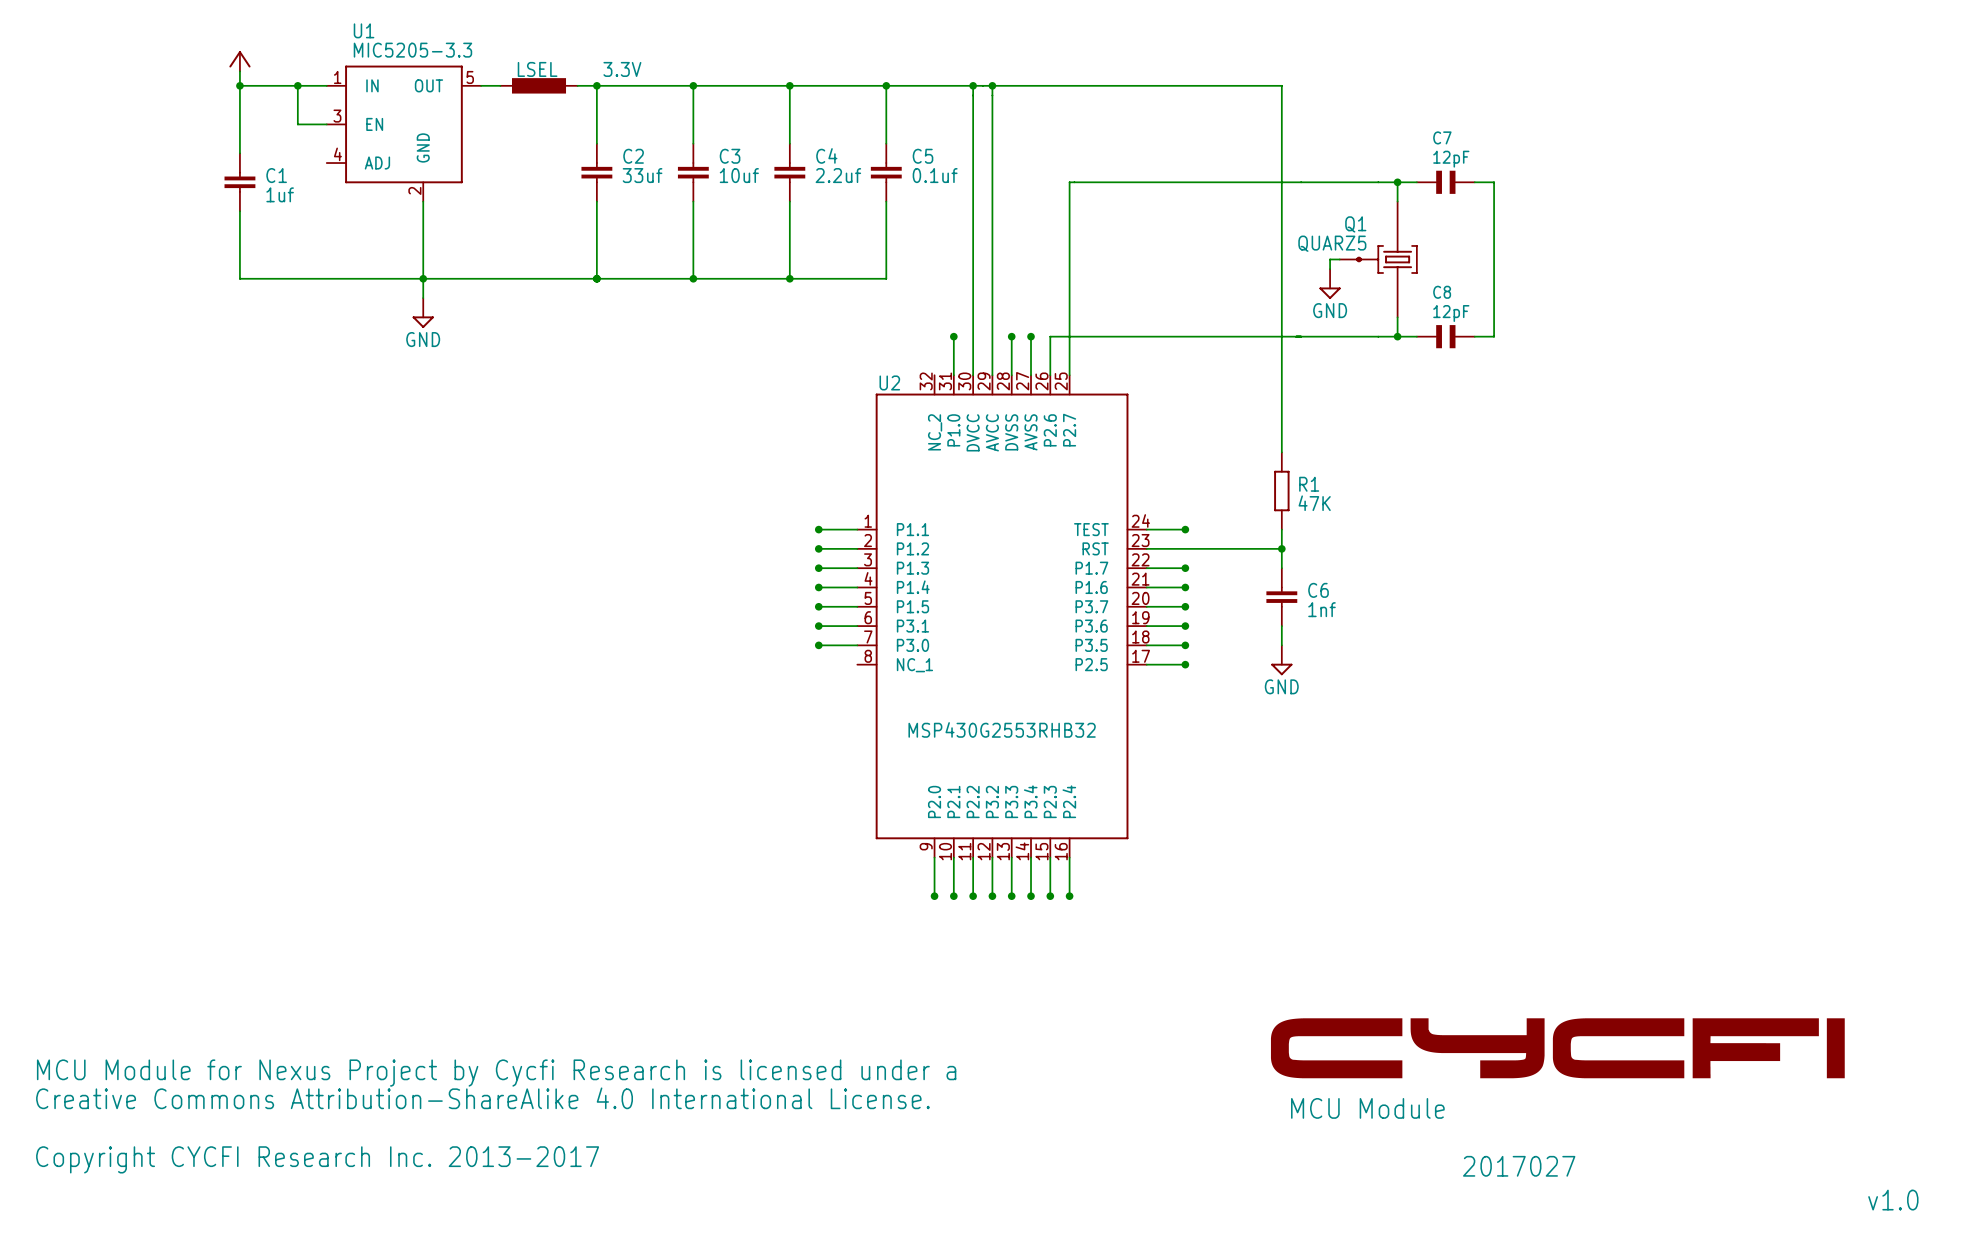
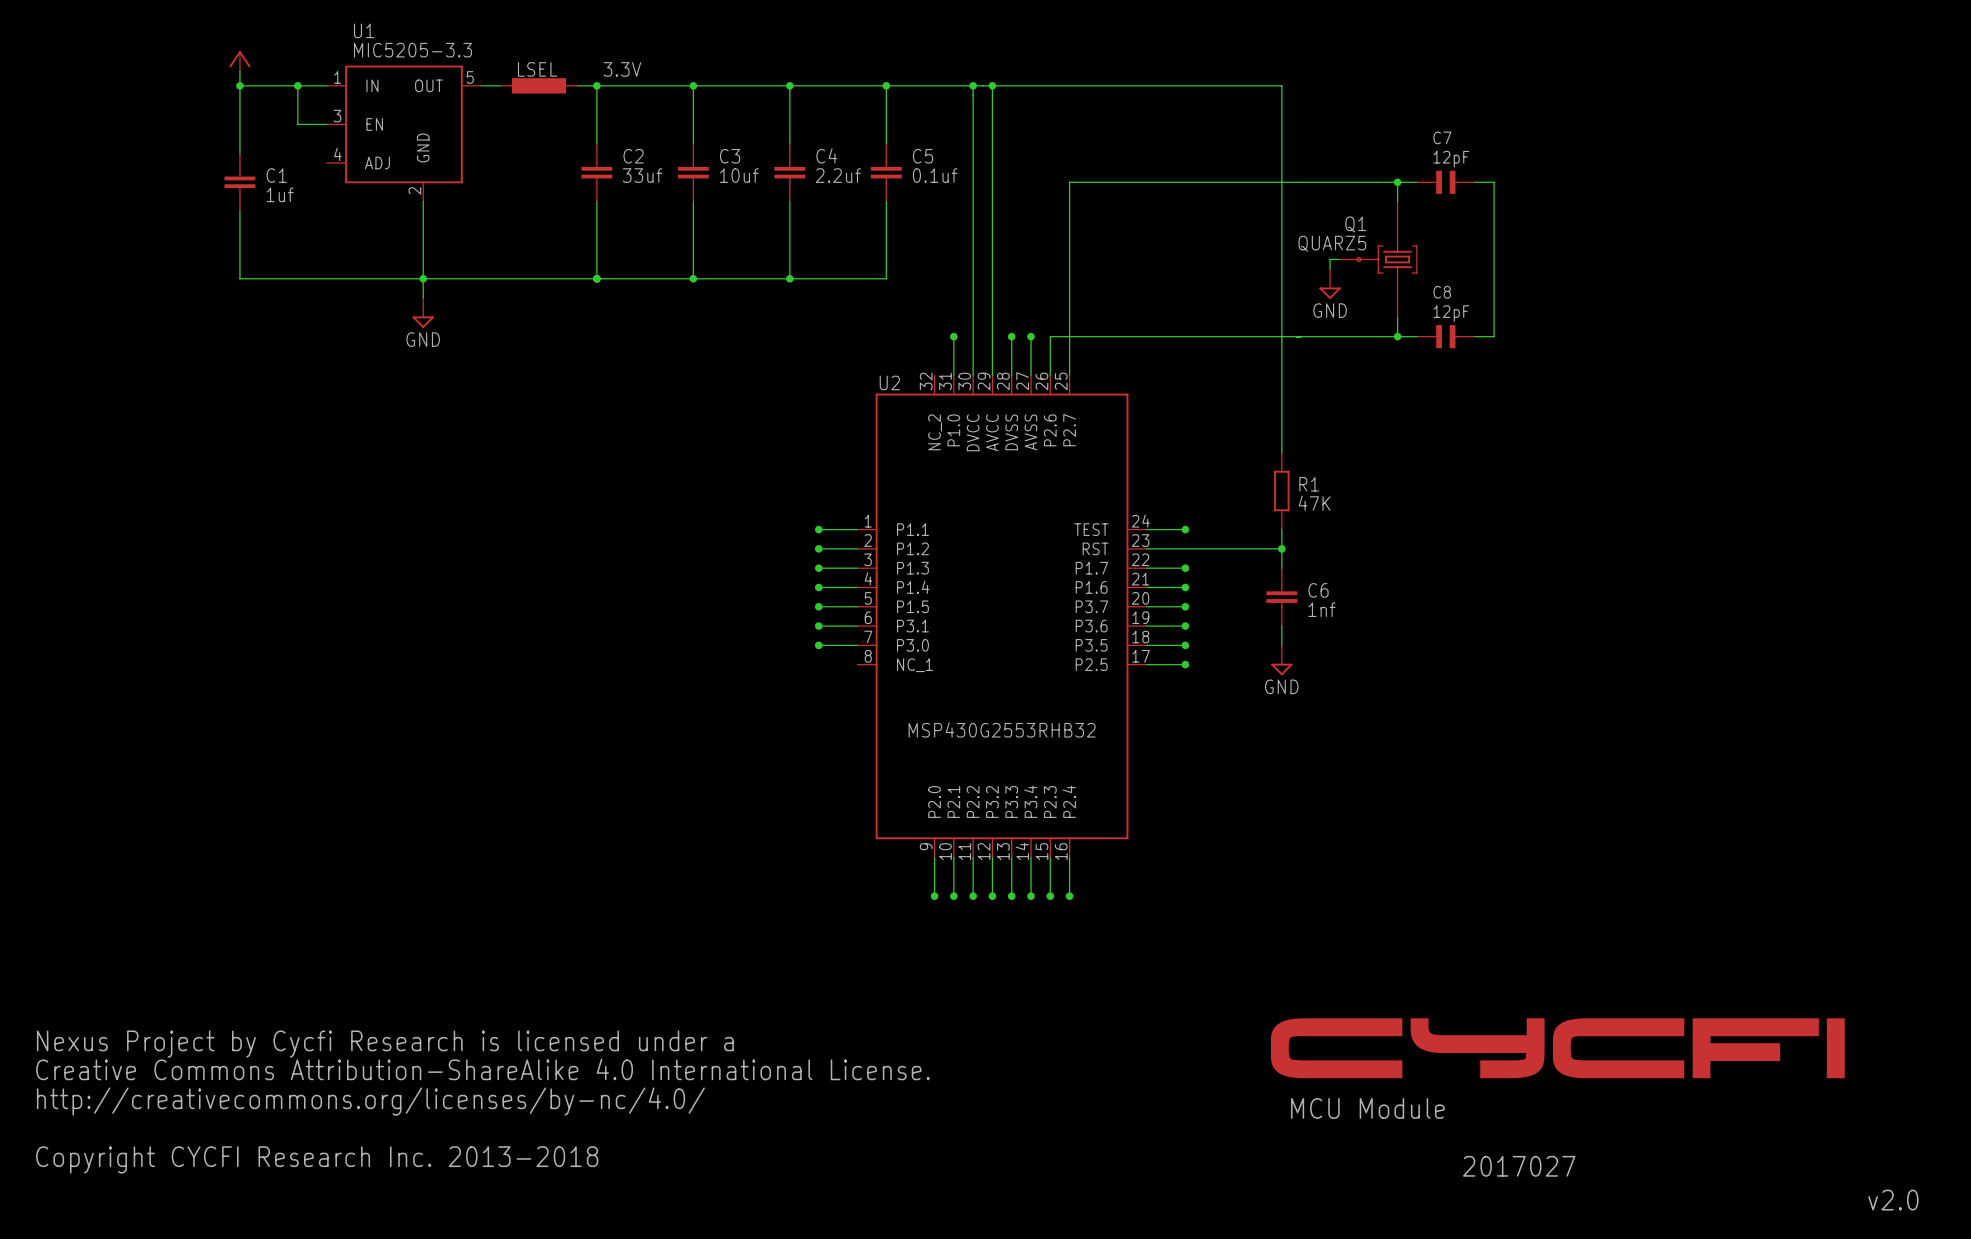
text: none -> Nexus Project by Cycfi Research is licensed under a (385, 1044)
text: MCU Module for Nexus Project by Cycfi Research is licensed under a (496, 1073) -> Creative Commons Attribution-ShareAlike 4.0 International License. (482, 1069)
text: Creative Commons Attribution-ShareAlike 4.0 International License. (482, 1098) -> http://creativecommons.org/licenses/by-nc/4.0/ (370, 1101)
text: Copyright CYCFI Research Inc. 2013-2017 (317, 1159) -> Copyright CYCFI Research Inc. 2013-2018 (317, 1159)
text: v1.0 (1893, 1200) -> v2.0 (1893, 1200)

